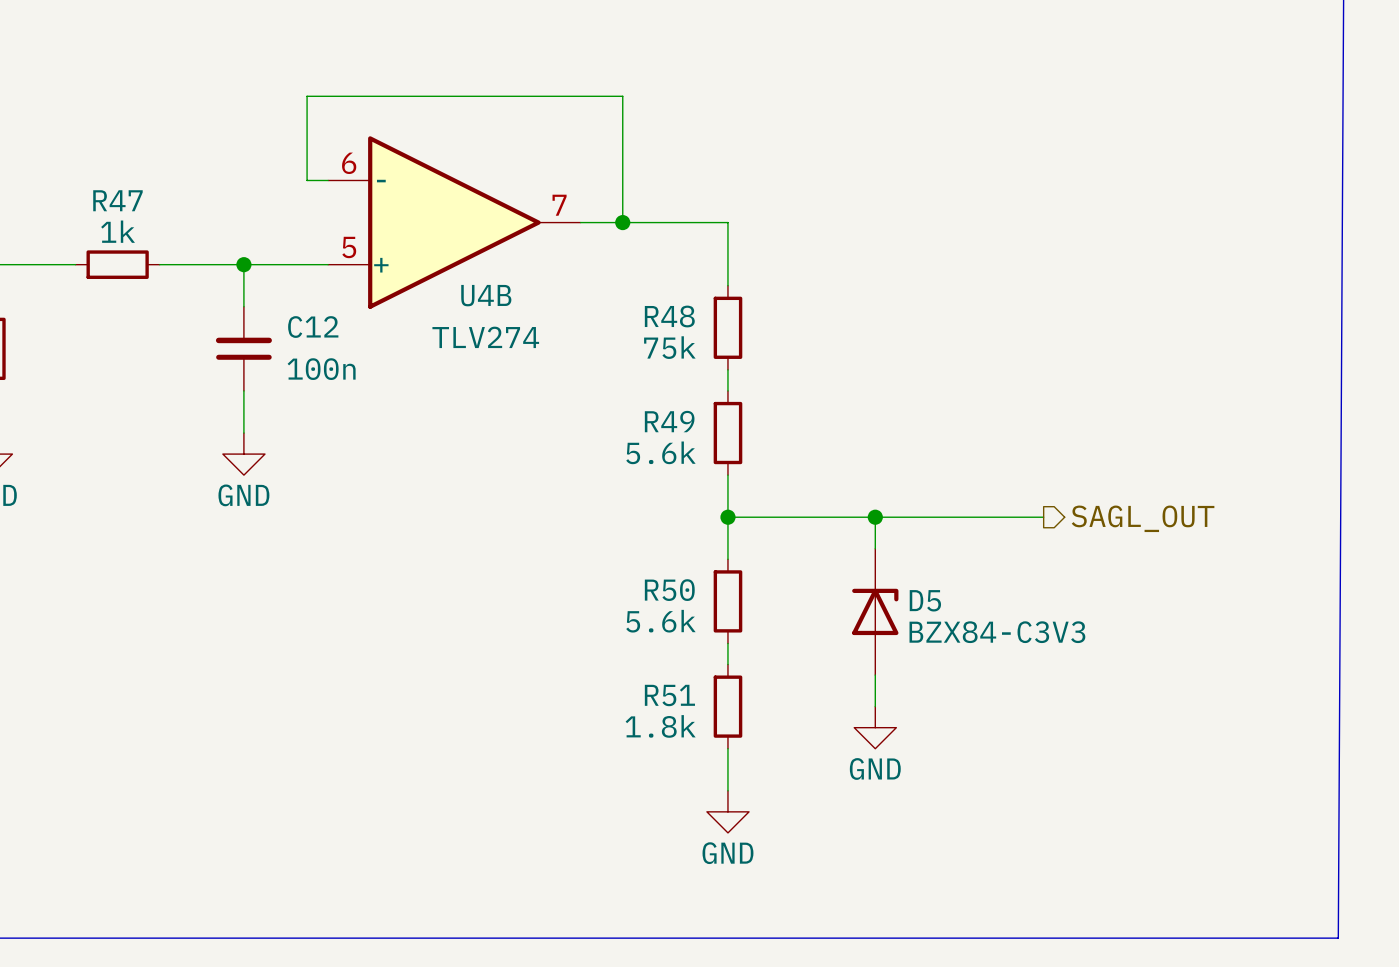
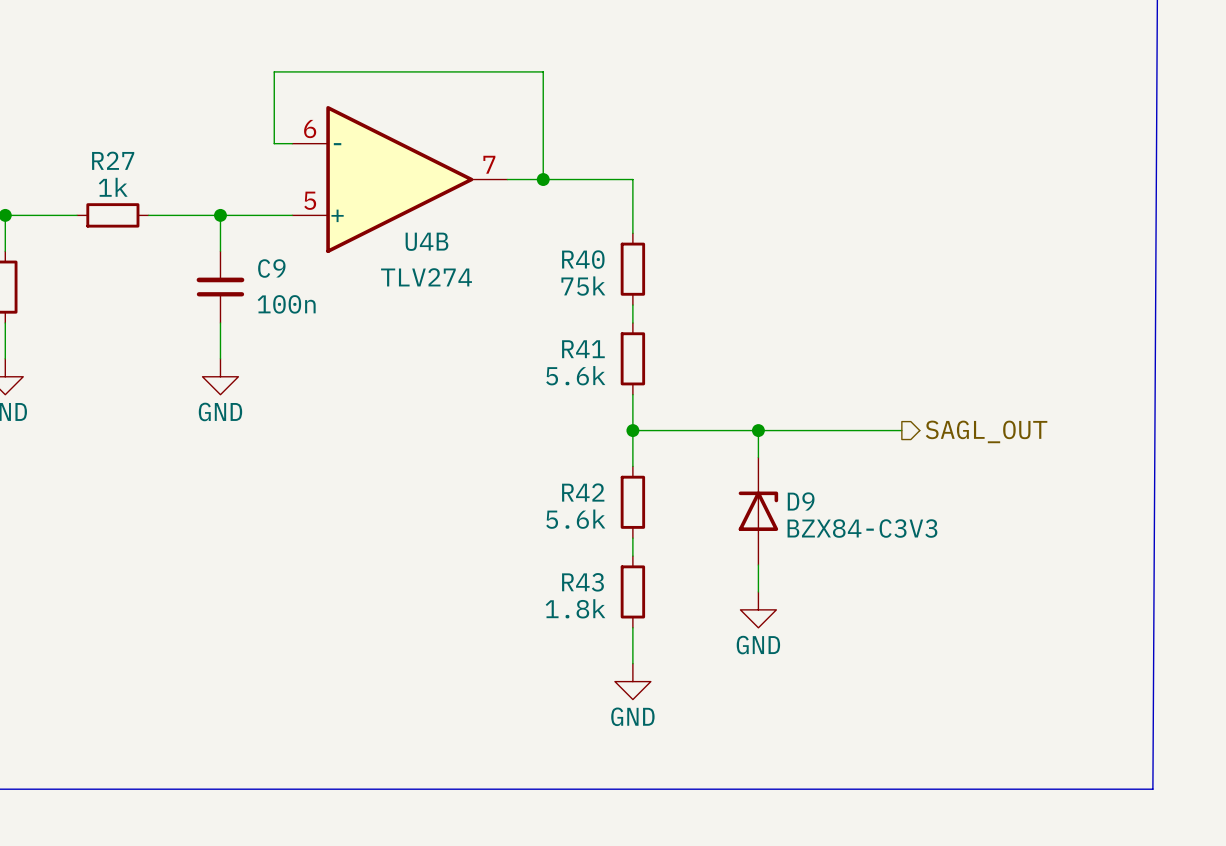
R47 name: R47 (117, 200) -> R27 (113, 160)
R48 name: R48 (669, 316) -> R40 (583, 259)
C12 name: C12 (313, 327) -> C9 (271, 268)
R49 name: R49 (669, 421) -> R41 (583, 349)
R50 name: R50 (669, 590) -> R42 (583, 492)
D5 name: D5 (925, 600) -> D9 (801, 501)
R51 name: R51 (669, 695) -> R43 (582, 582)

